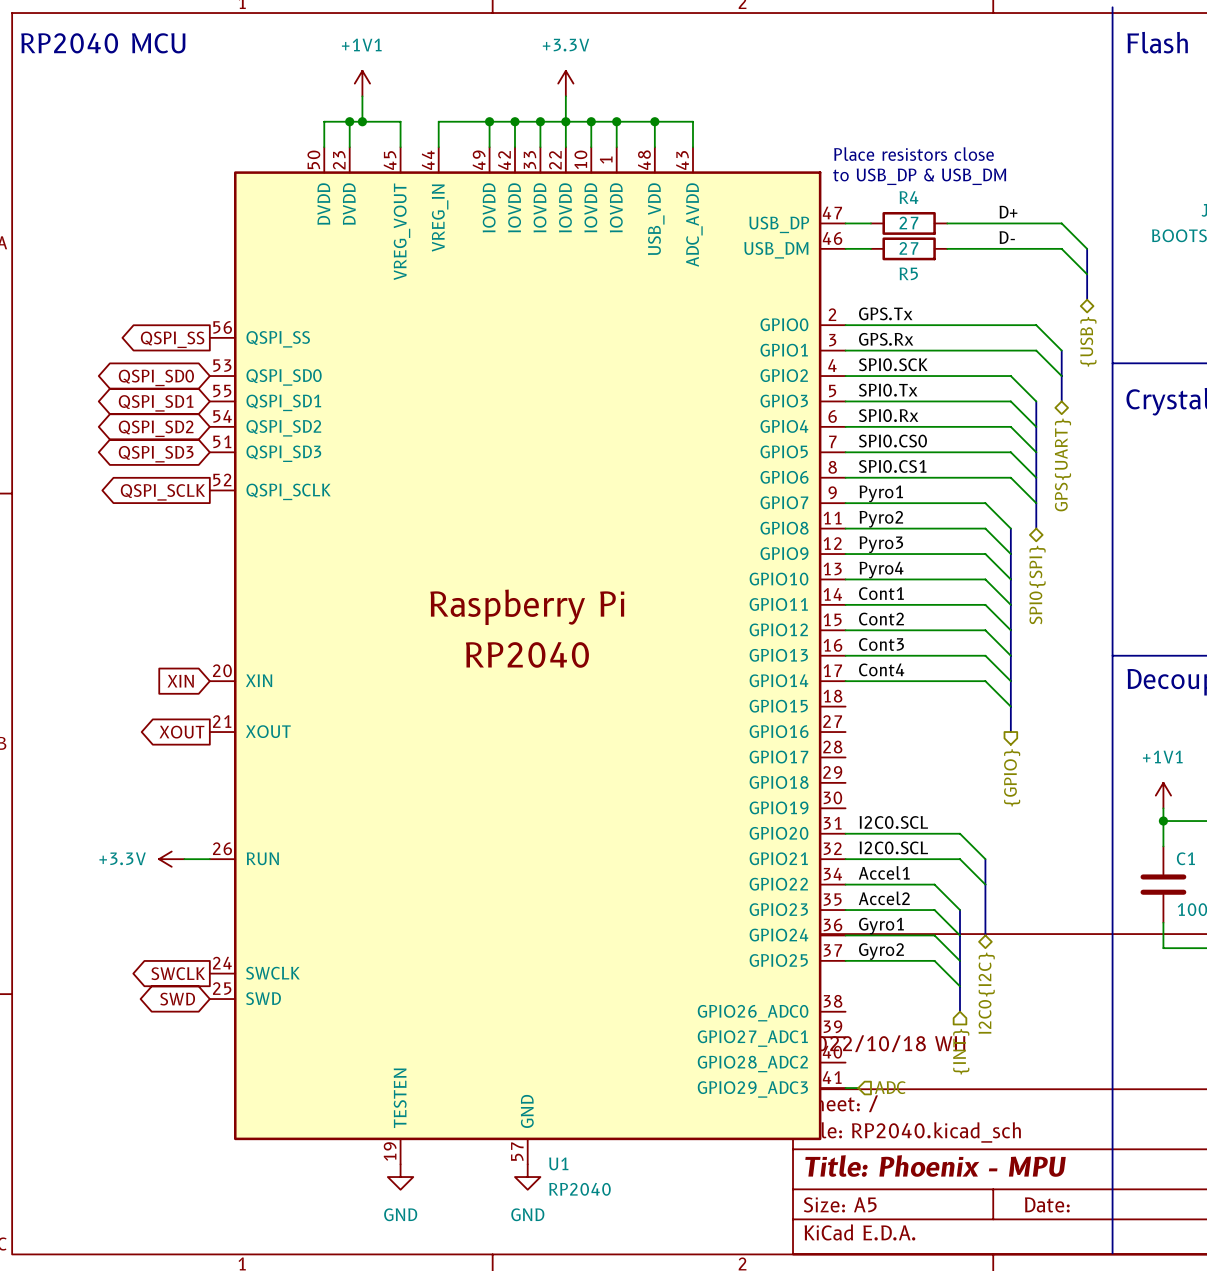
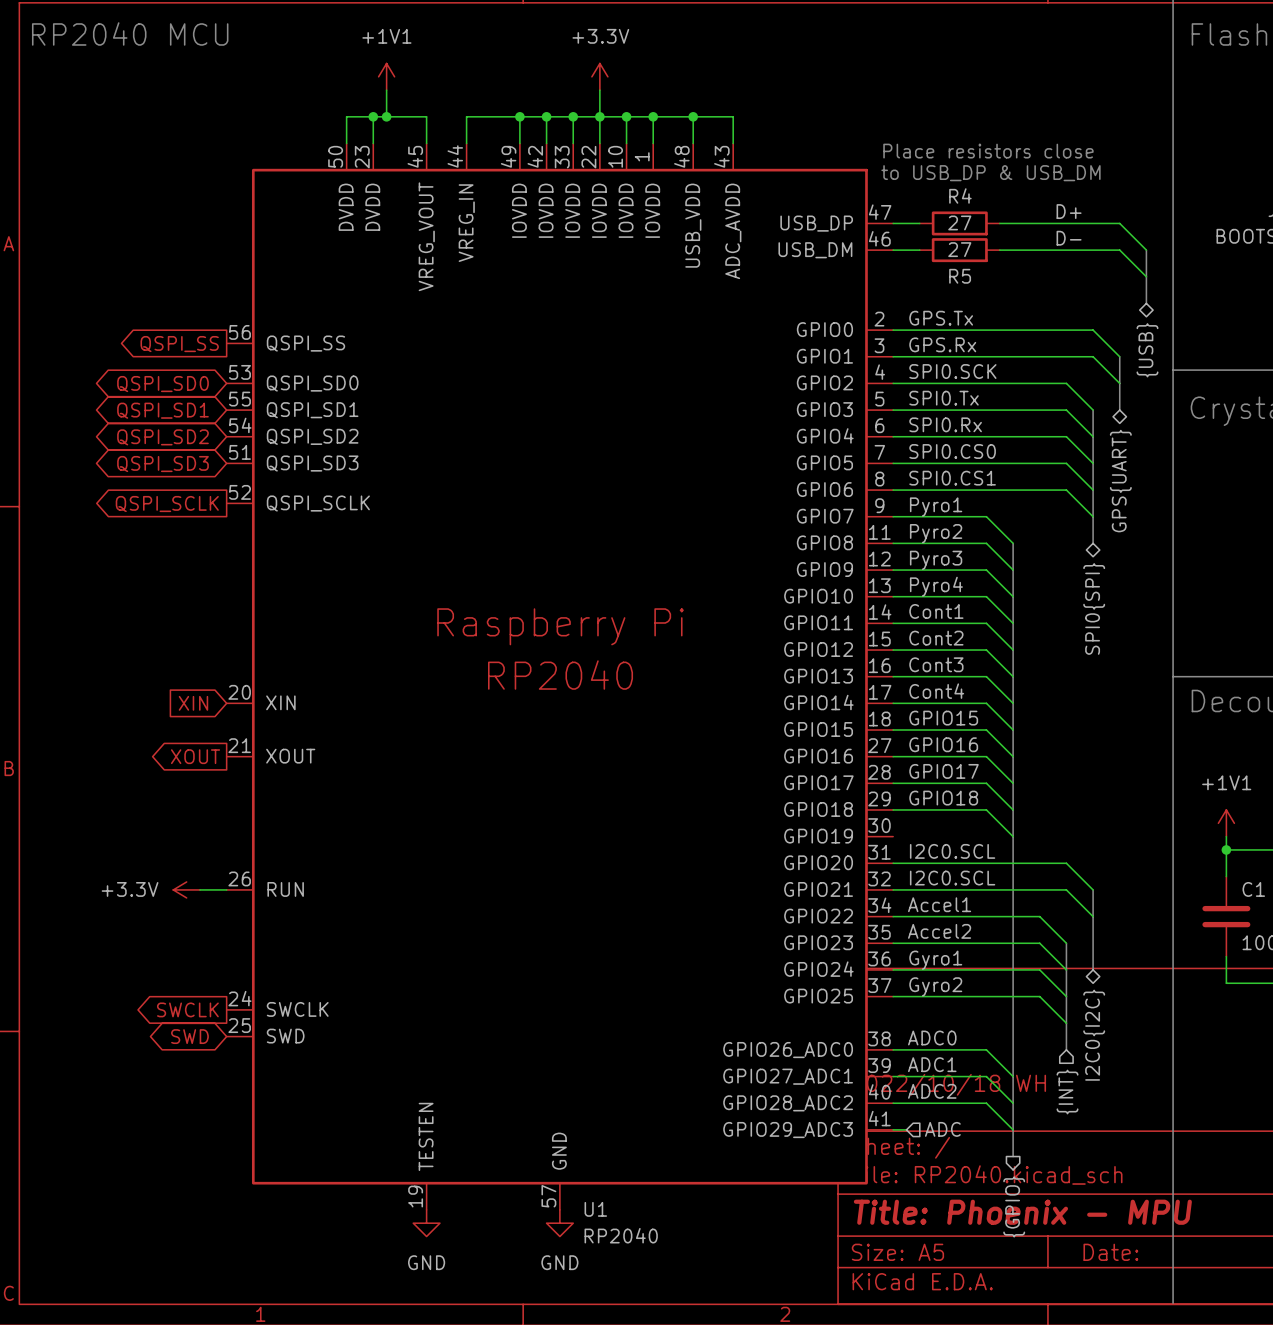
wire: (934, 503) (985, 503) (1010, 528) -> (986, 516) (1013, 543)
wire: (934, 528) (985, 528) (1010, 554) -> (986, 543) (1013, 570)
bus: none -> (1013, 543) (1013, 943)
bus: (1010, 528) (1010, 732) -> none
wire: (934, 554) (985, 554) (1010, 579) -> (986, 570) (1013, 596)
wire: (934, 579) (985, 579) (1010, 604) -> (986, 596) (1013, 623)
wire: (934, 604) (985, 604) (1010, 630) -> (986, 623) (1013, 650)
wire: (934, 630) (985, 630) (1010, 655) -> (986, 650) (1013, 676)
wire: (934, 655) (985, 655) (1010, 681) -> (986, 676) (1013, 703)
wire: (934, 681) (985, 681) (1010, 706) -> (986, 703) (1013, 729)
label: none -> GPIO15 (943, 718)
wire: none -> (893, 729) (986, 729) (1013, 756)
label: none -> GPIO16 (943, 744)
wire: none -> (893, 756) (986, 756) (1013, 783)
label: none -> GPIO17 (944, 771)
wire: none -> (893, 783) (986, 783) (1013, 809)
label: none -> GPIO18 (943, 798)
hierarchical label: {GPIO} (1012, 777) -> none
wire: none -> (893, 809) (986, 809) (1013, 836)
wire: (959, 833) (985, 859) -> (1013, 863) (1066, 863) (1093, 889)
wire: (959, 859) (985, 884) -> (1013, 889) (1066, 889) (1093, 916)
bus: (985, 859) (985, 935) -> (1093, 889) (1093, 969)
wire: (934, 884) (959, 910) -> (986, 916) (1039, 916) (1066, 943)
wire: (934, 910) (959, 935) -> (986, 943) (1039, 943) (1066, 969)
bus: none -> (1066, 943) (1066, 1049)
wire: (934, 935) (959, 960) -> (986, 969) (1039, 969) (1066, 996)
wire: (934, 960) (959, 986) -> (986, 996) (1039, 996) (1066, 1023)
hierarchical label position: I2C0{I2C} (986, 993) -> I2C0{I2C} (1094, 1035)
label: none -> ADC0 (932, 1038)
wire: none -> (893, 1049) (986, 1049) (1013, 1076)
bus: none -> (1013, 1049) (1013, 1156)
label: none -> ADC1 (932, 1064)
wire: none -> (893, 1076) (986, 1076) (1013, 1103)
label: none -> ADC2 (932, 1091)
hierarchical label position: {INT} (961, 1051) -> {INT} (1067, 1092)
wire: none -> (893, 1103) (986, 1103) (1013, 1129)
hierarchical label: none -> {GPIO} (1014, 1206)

